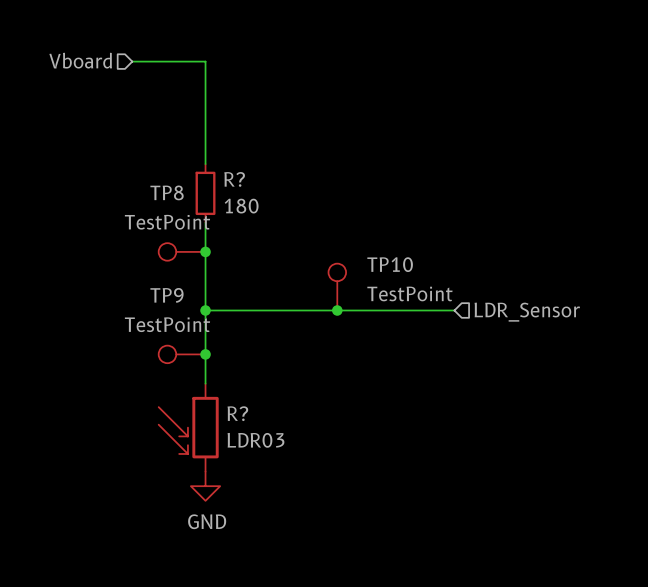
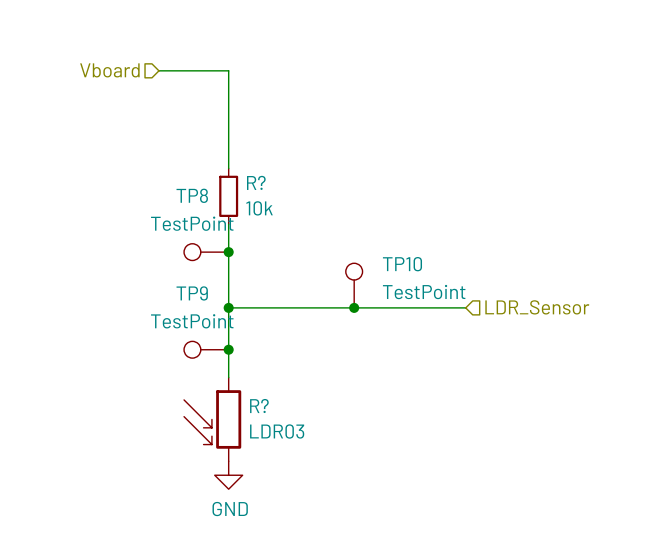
R? value: 180 (241, 206) -> 10k (259, 208)

